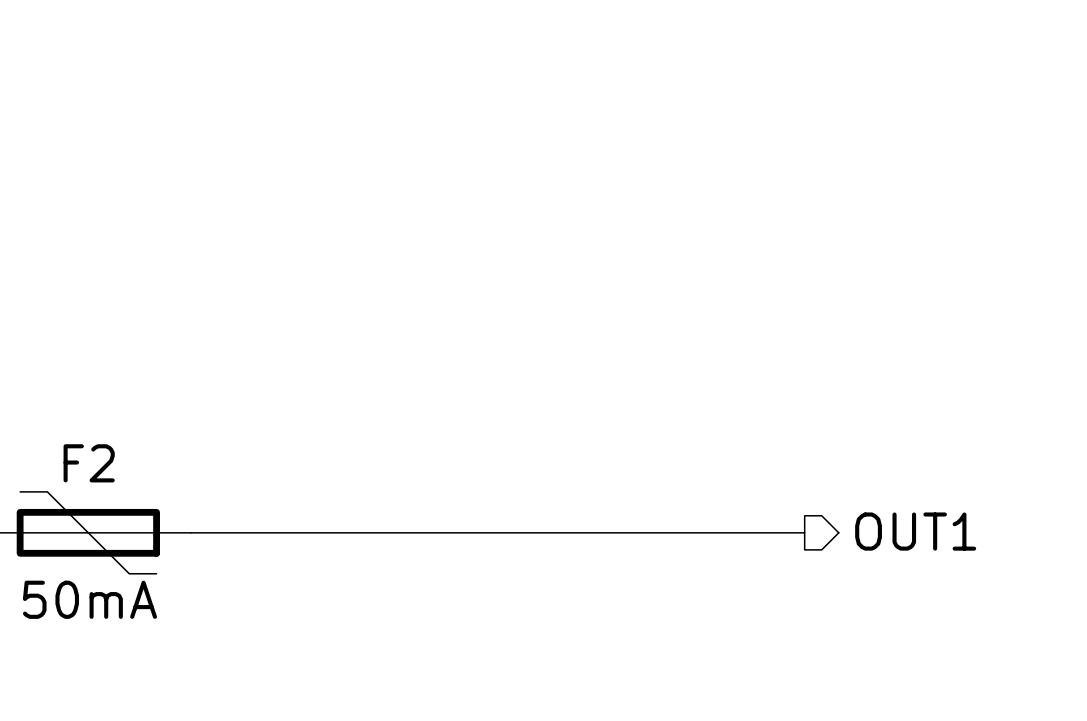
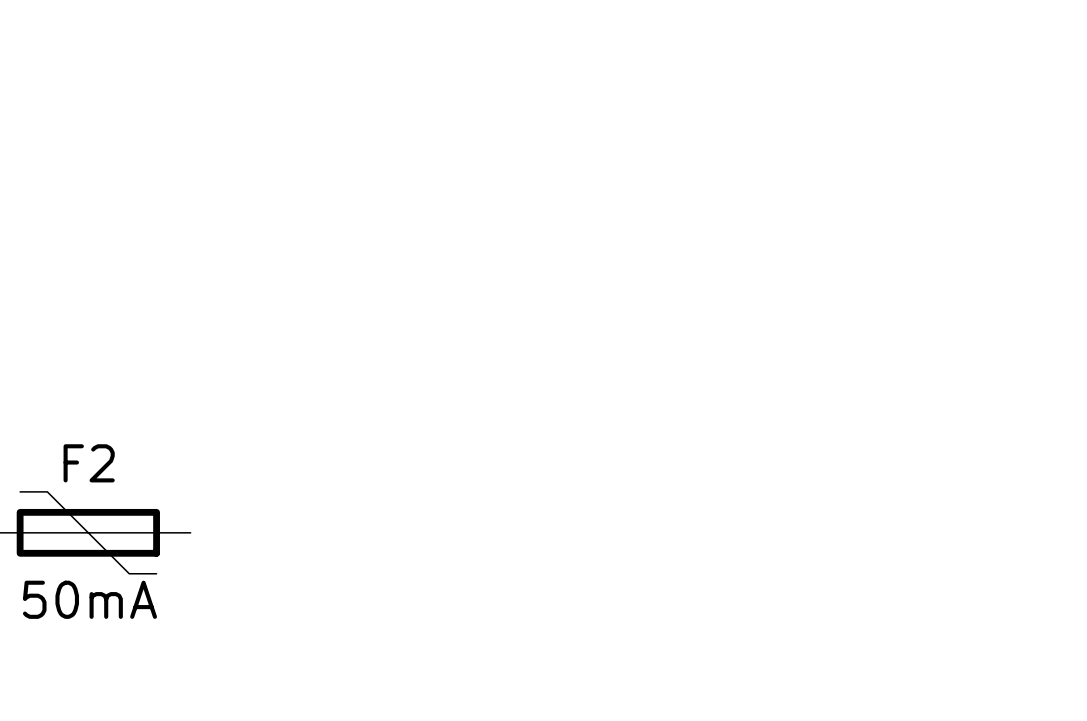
hierarchical label: OUT1 (915, 531) -> none
wire: (190, 532) (804, 532) -> none

